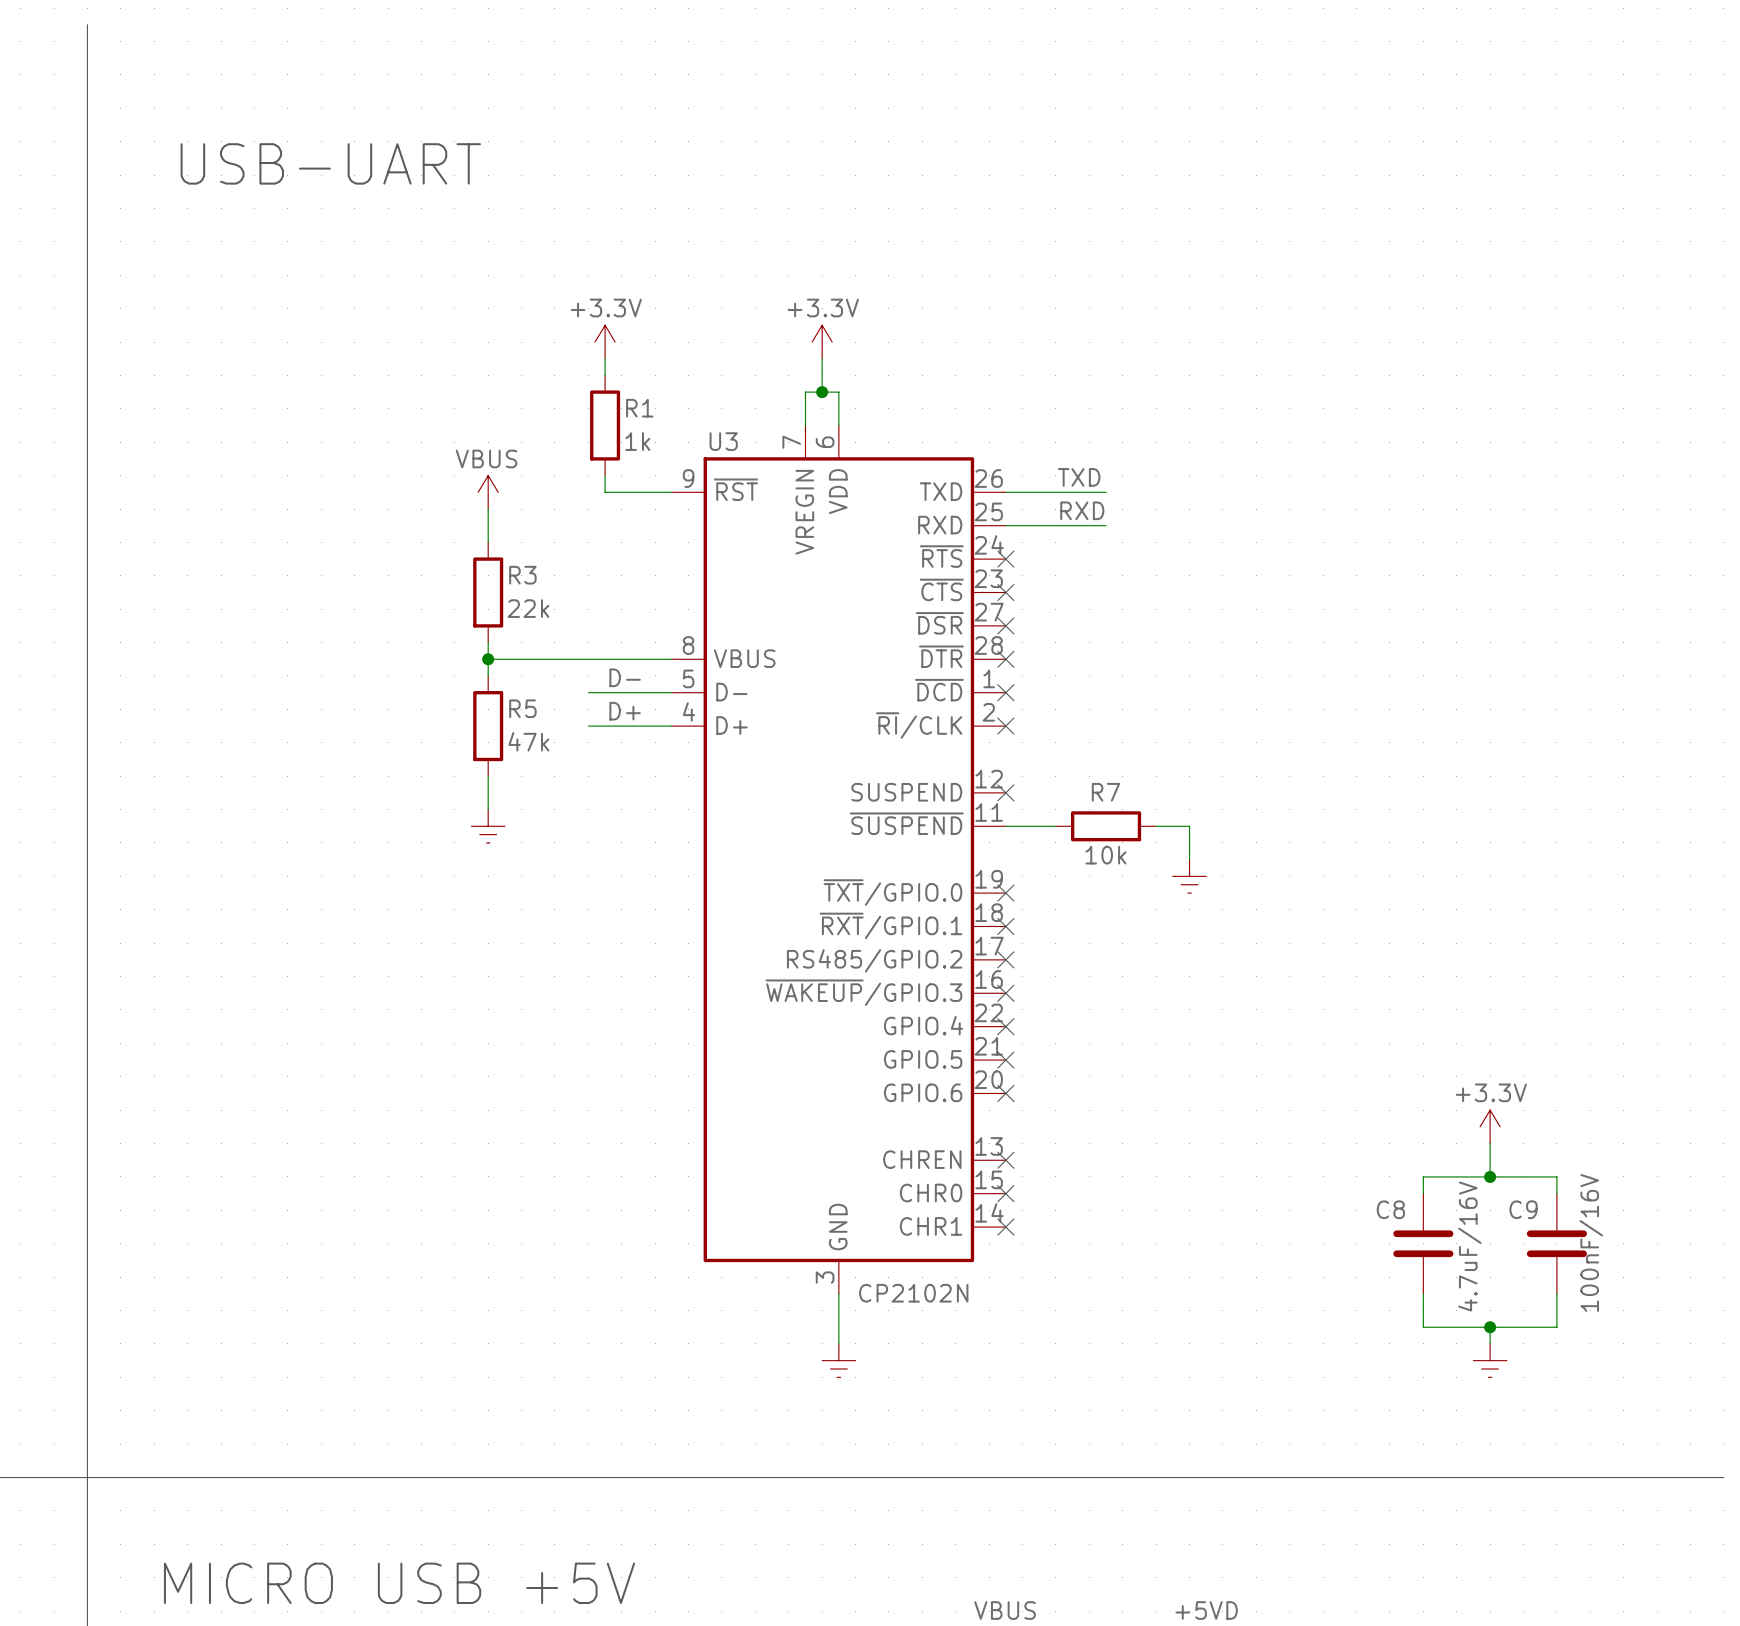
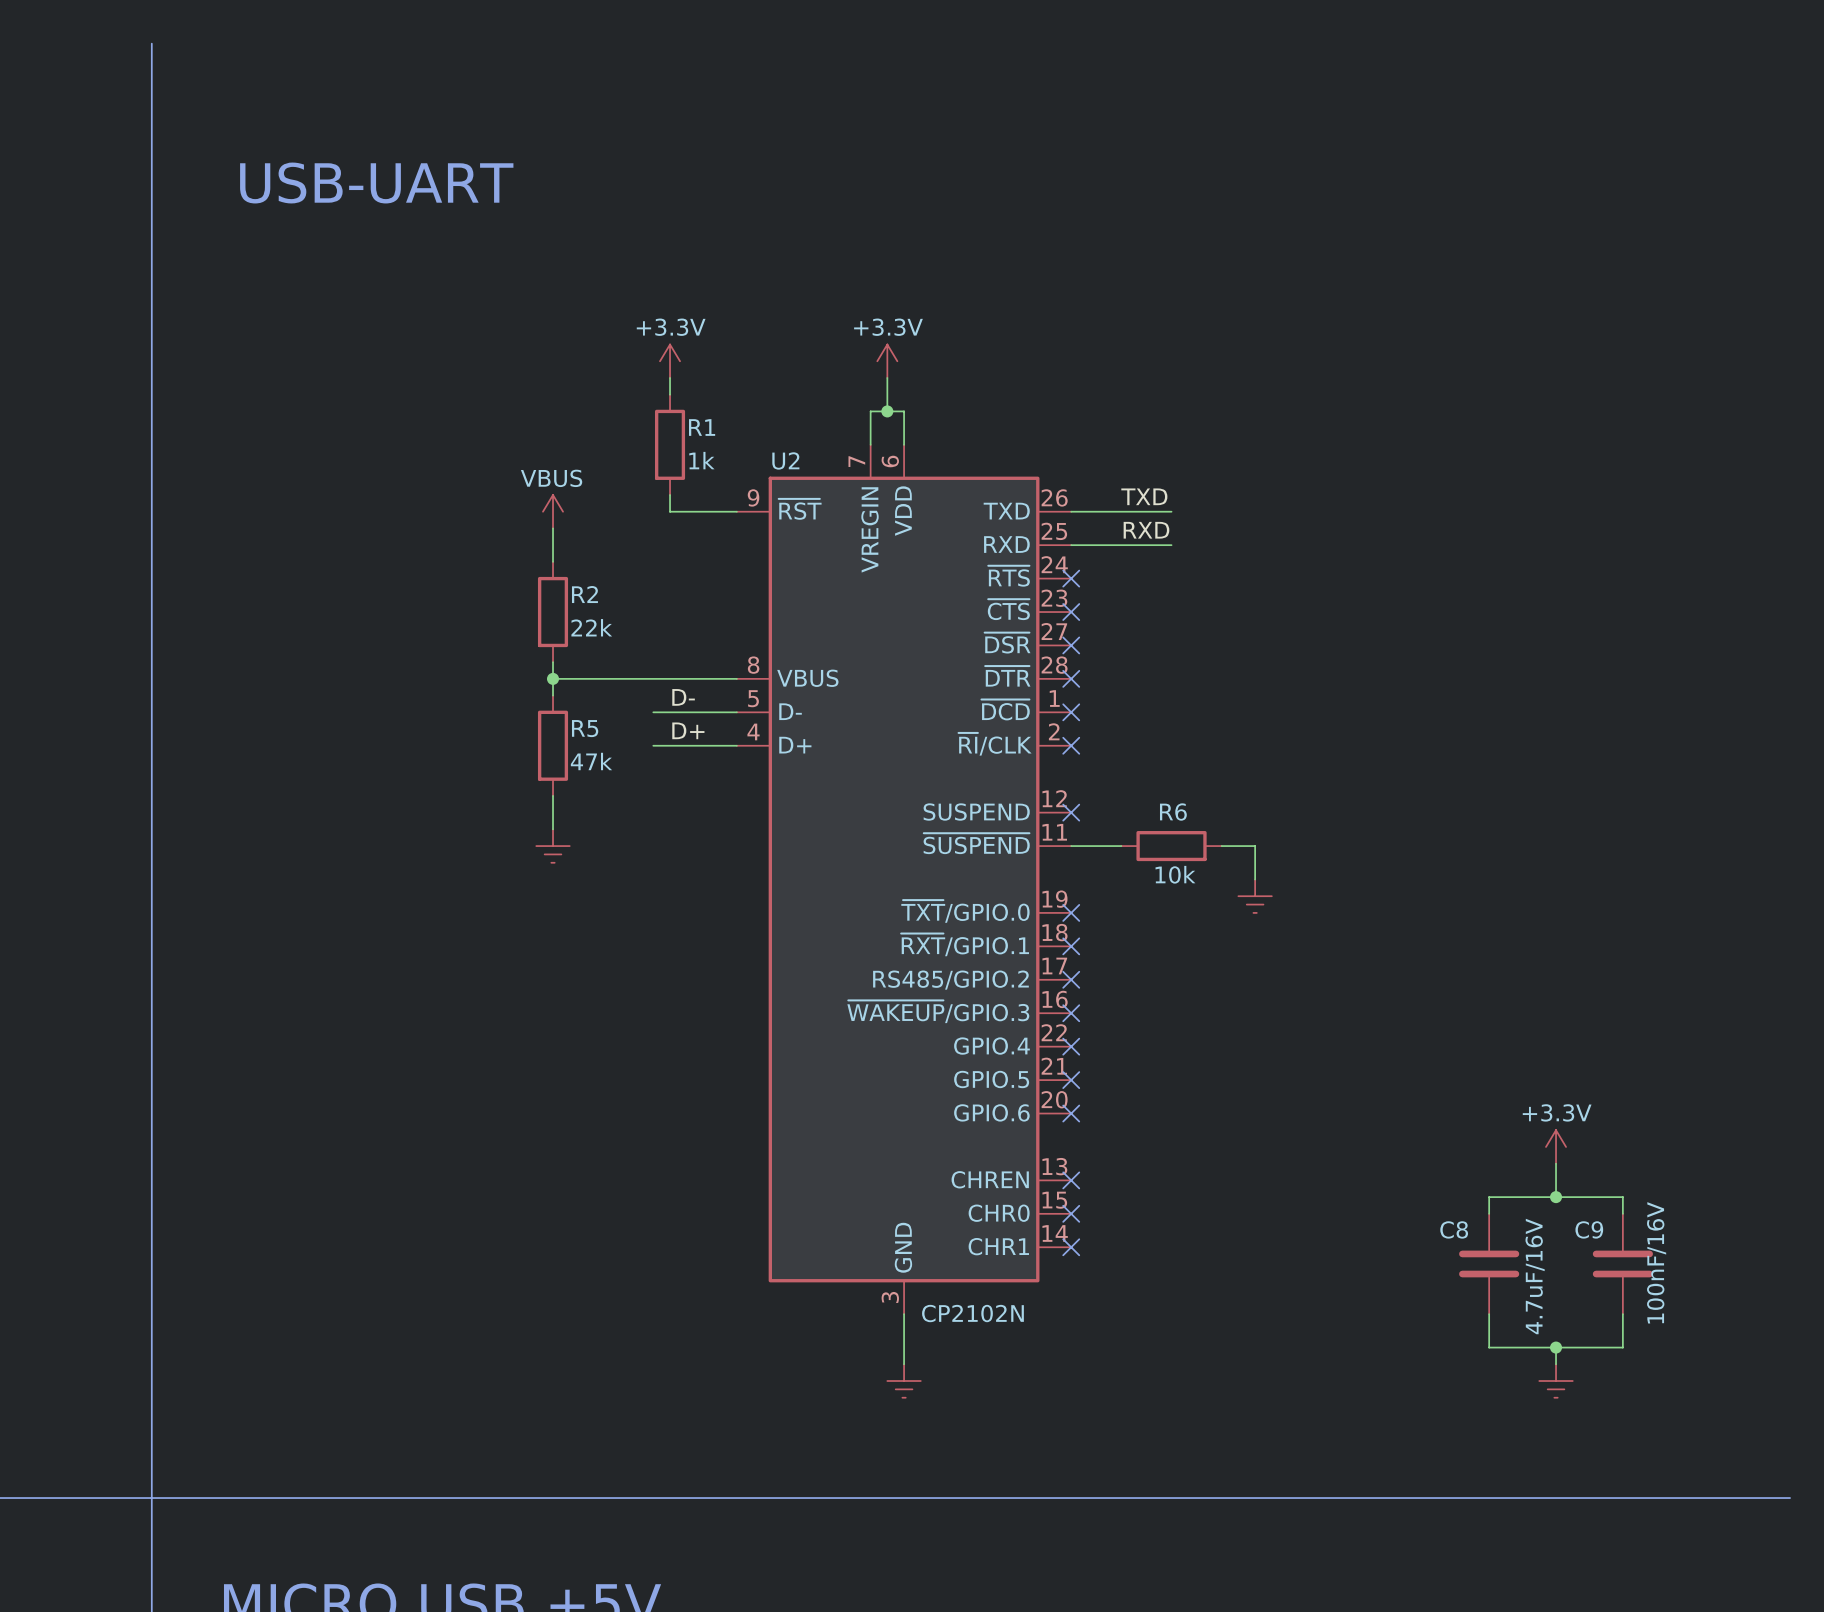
U3 name: U3 (723, 441) -> U2 (785, 460)
R3 name: R3 (522, 575) -> R2 (584, 594)
R7 name: R7 (1105, 792) -> R6 (1173, 812)

